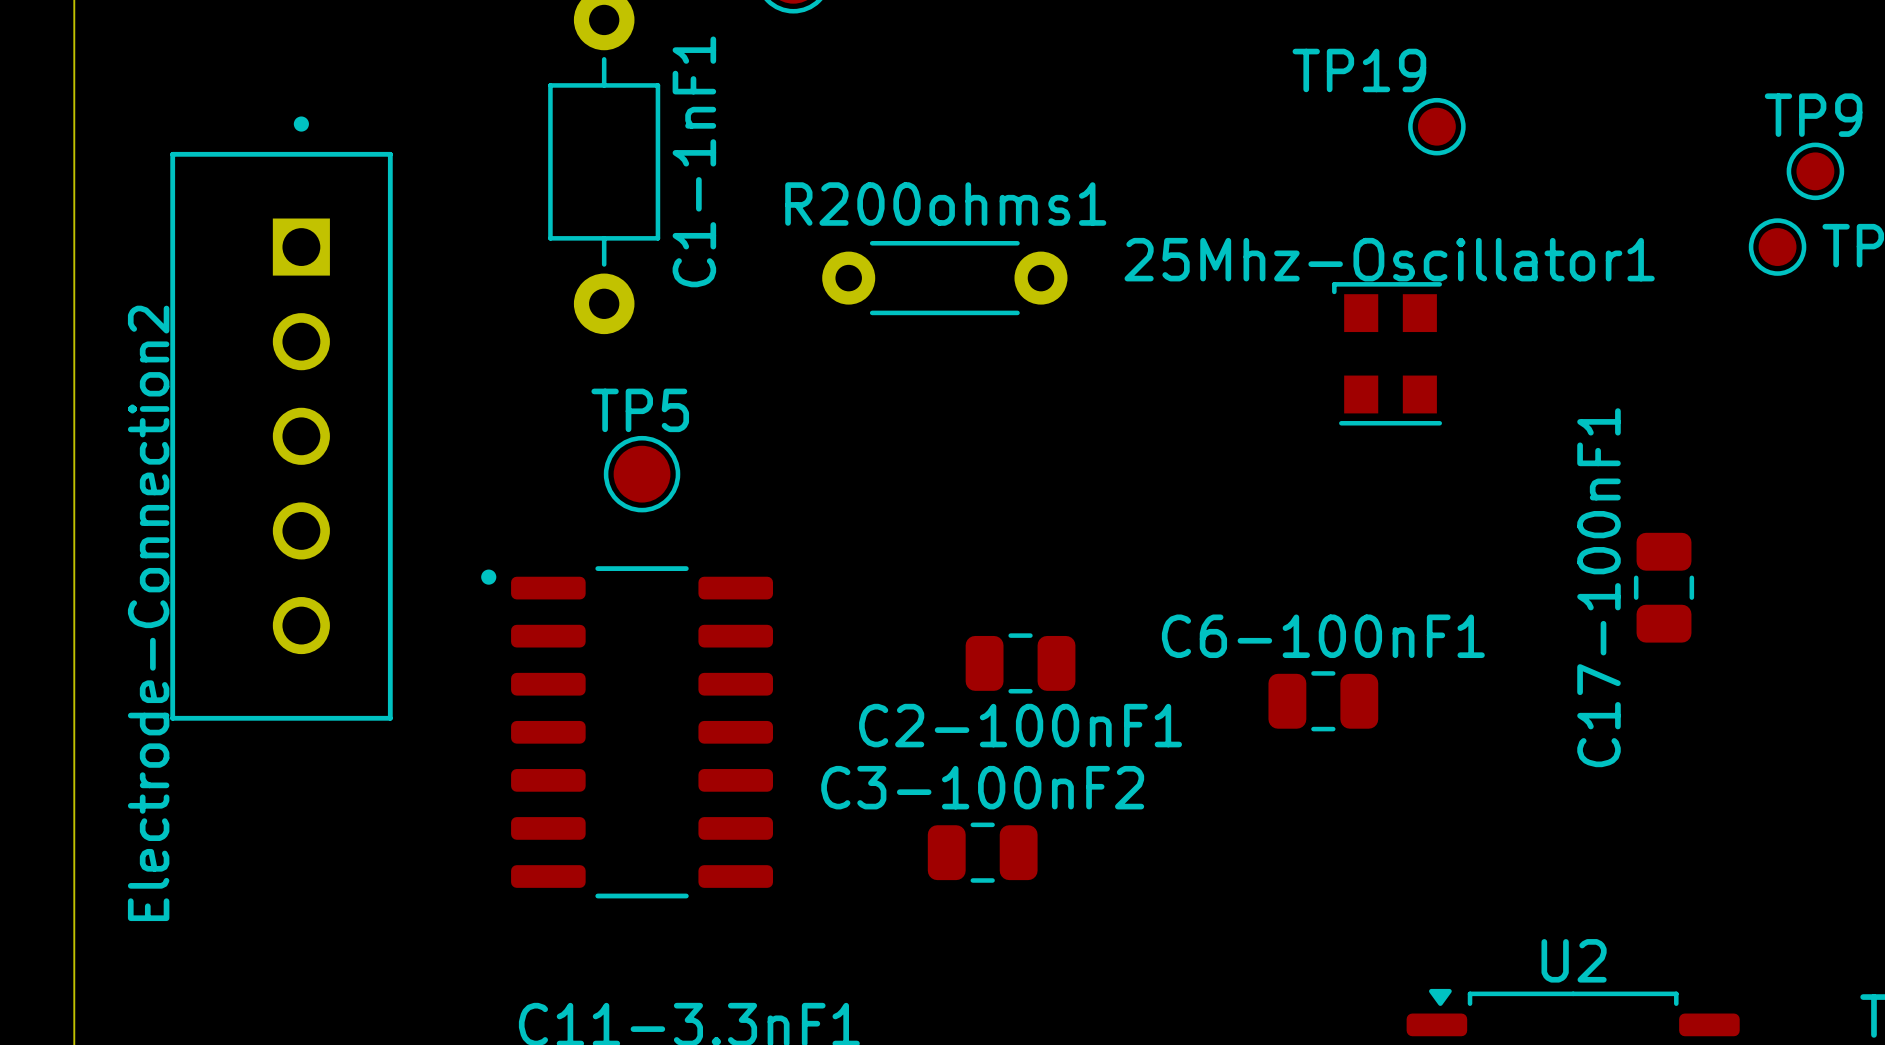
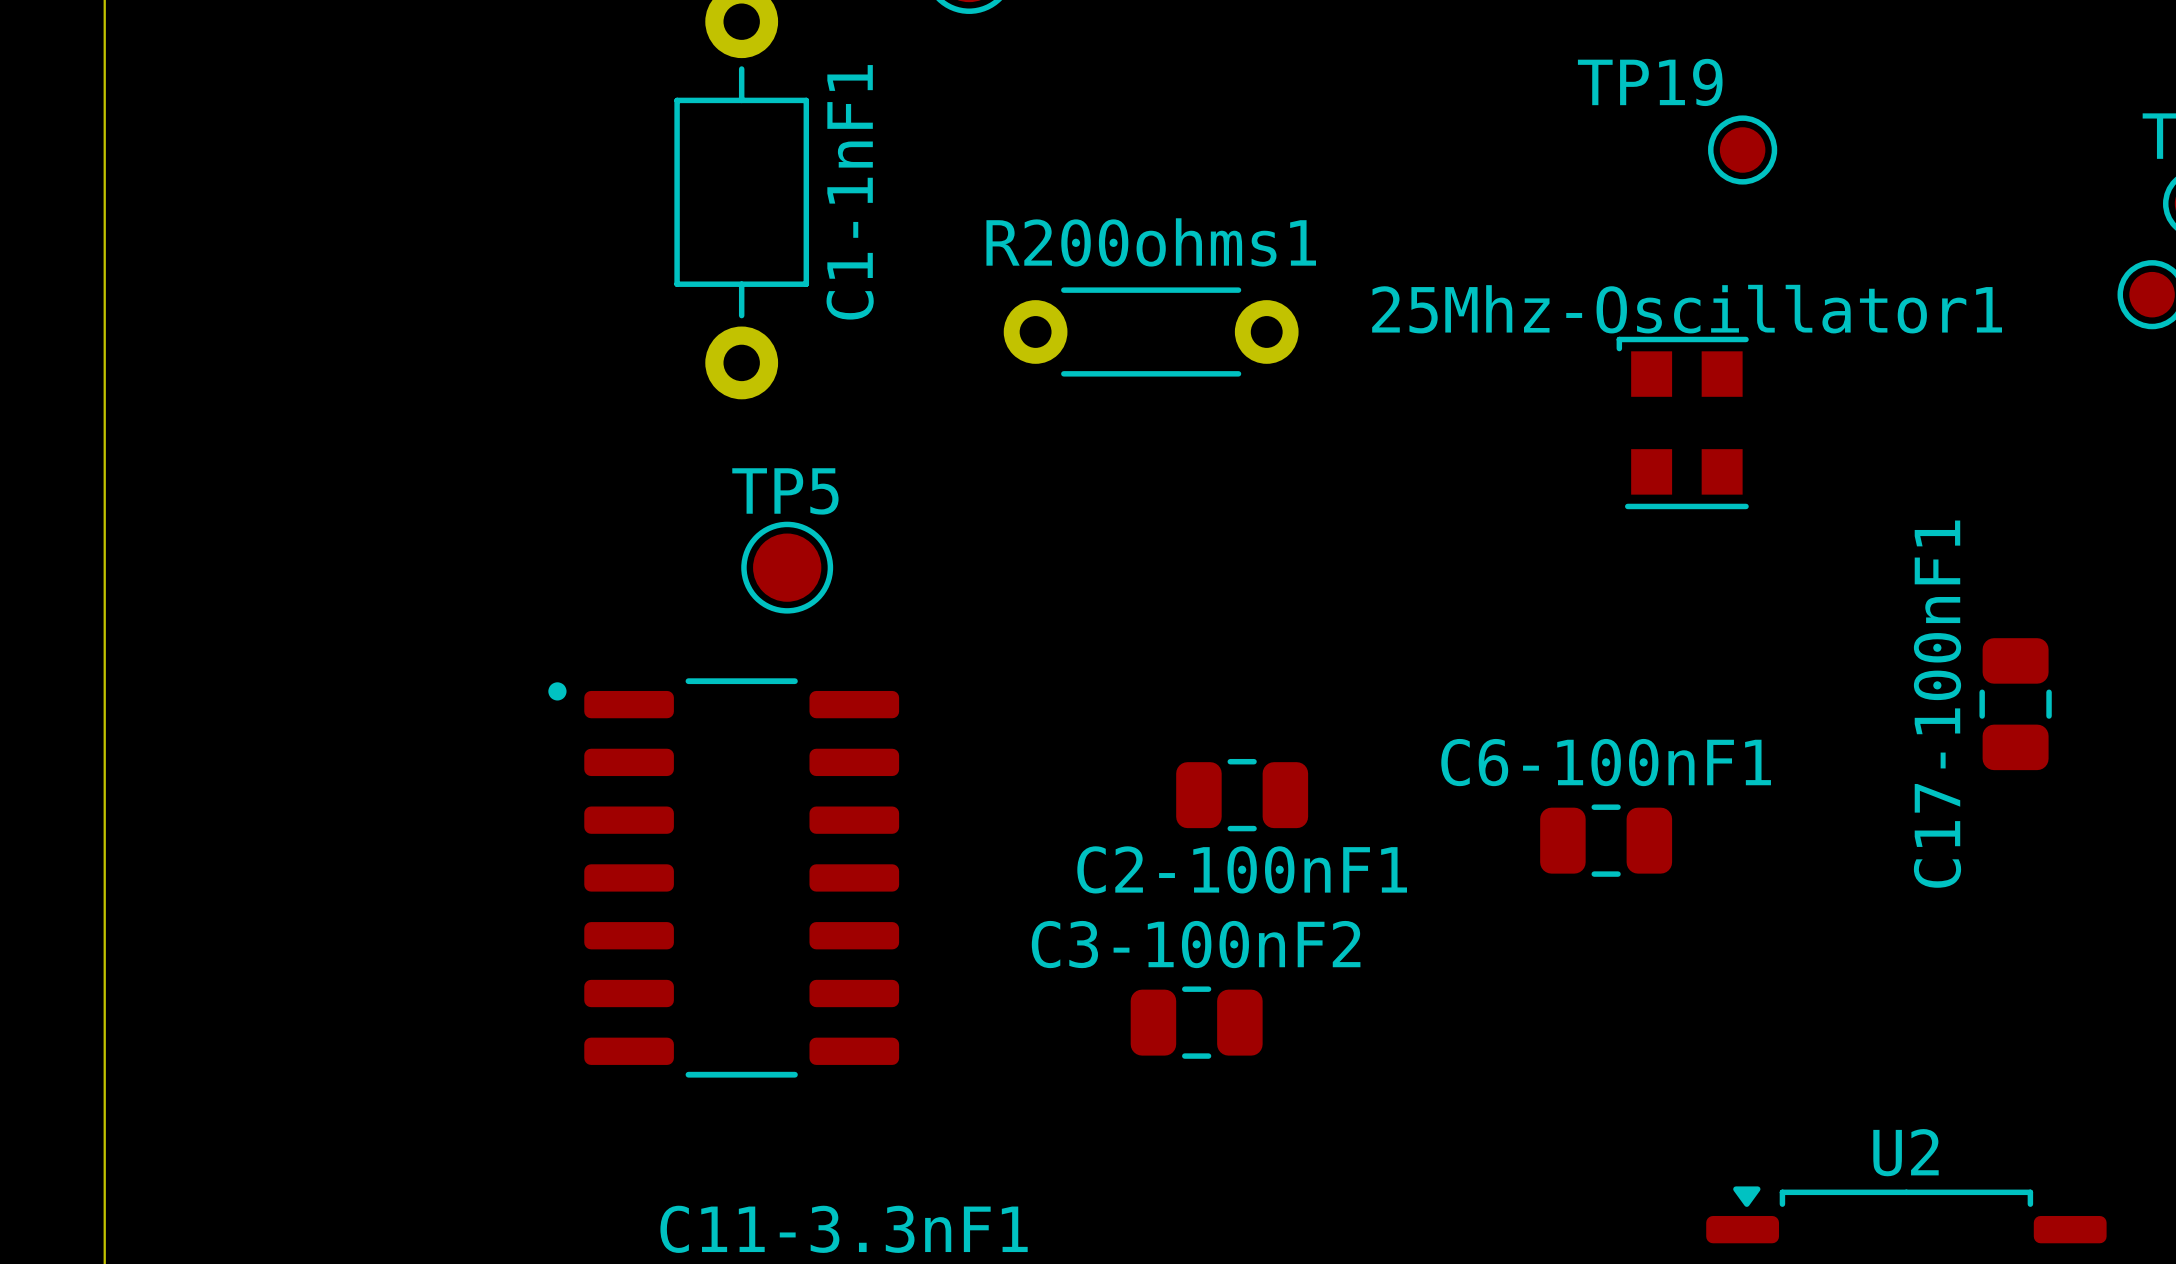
Electrode-Connection2: (281, 418) -> none
part position: (627, 732) -> (723, 877)

